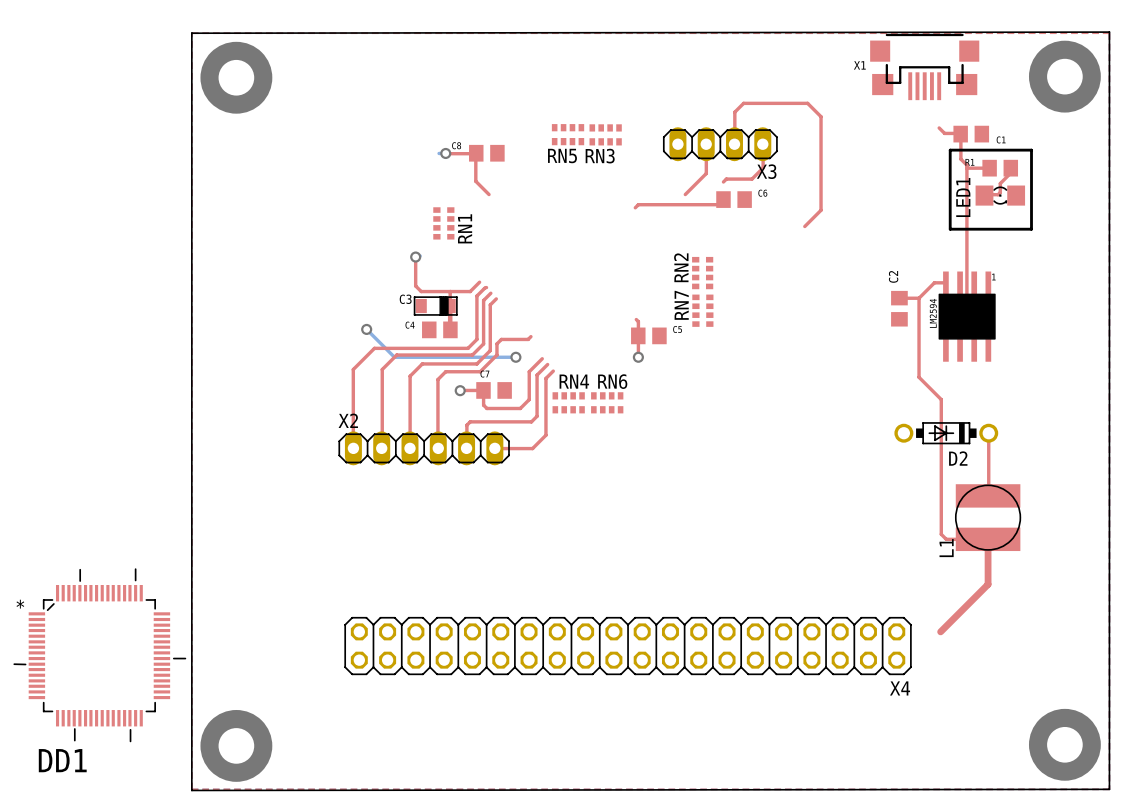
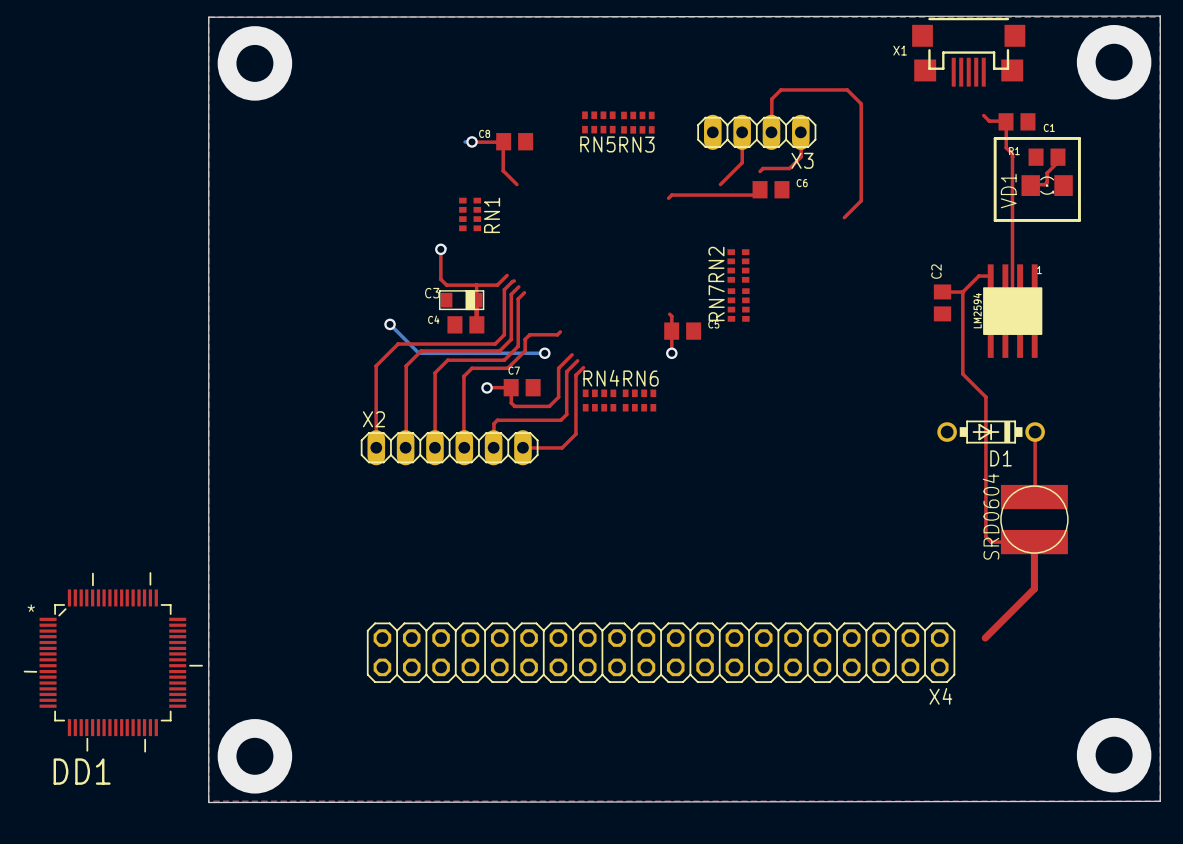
top track: (967, 168) (989, 168) -> none
LED1 name: LED1 (963, 197) -> VD1 (1008, 191)
D2 name: D2 (958, 458) -> D1 (1001, 458)
L1 text: none -> SRD0604 (991, 516)
L1 name: L1 (946, 548) -> none

